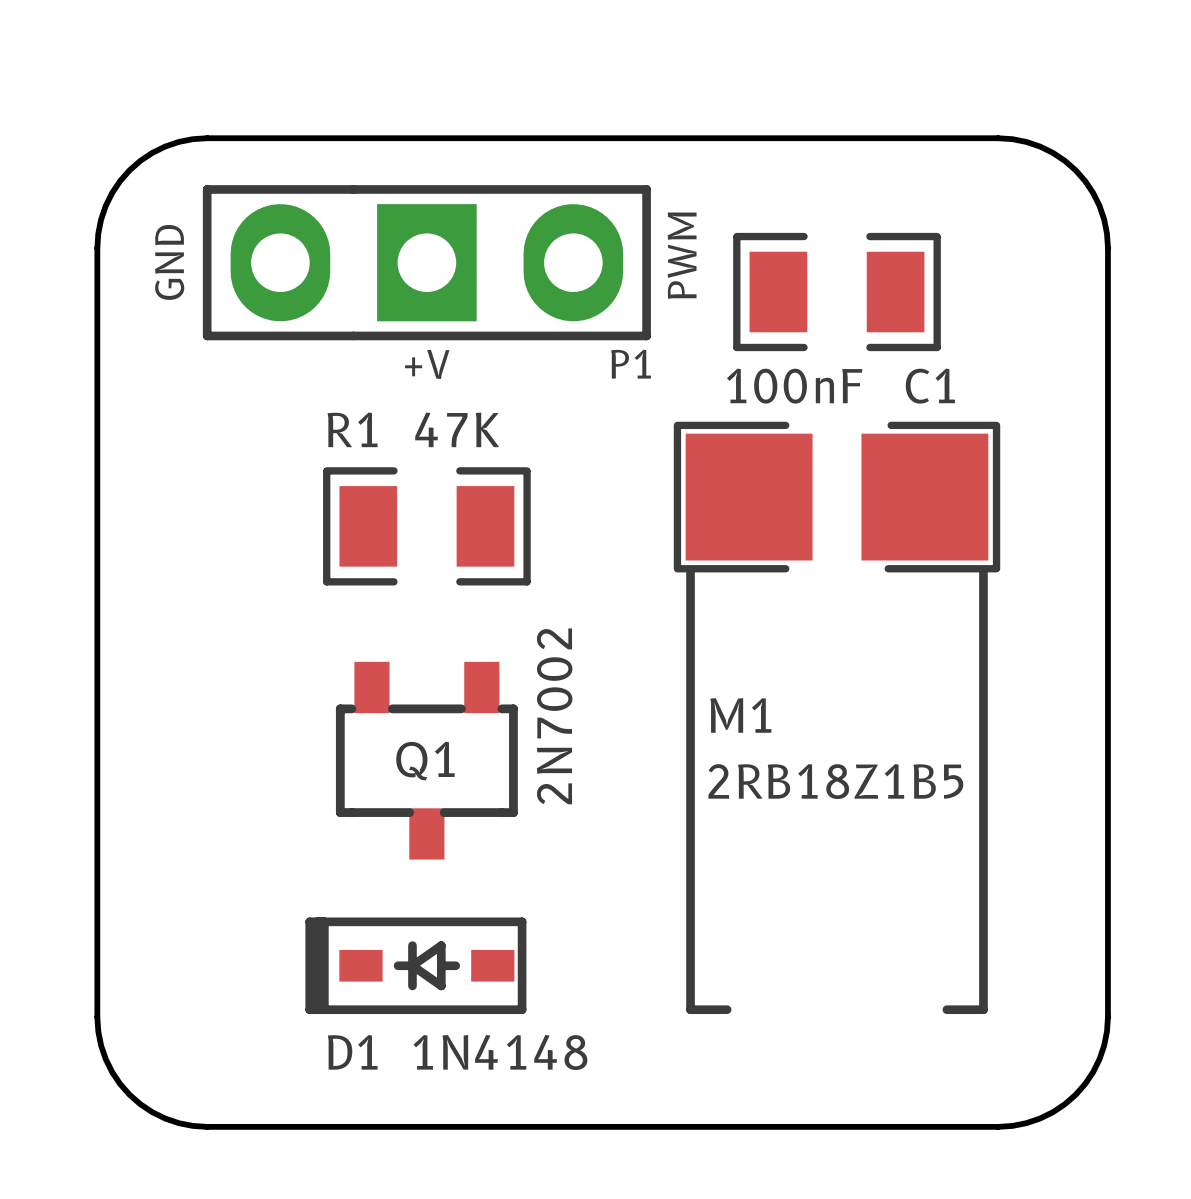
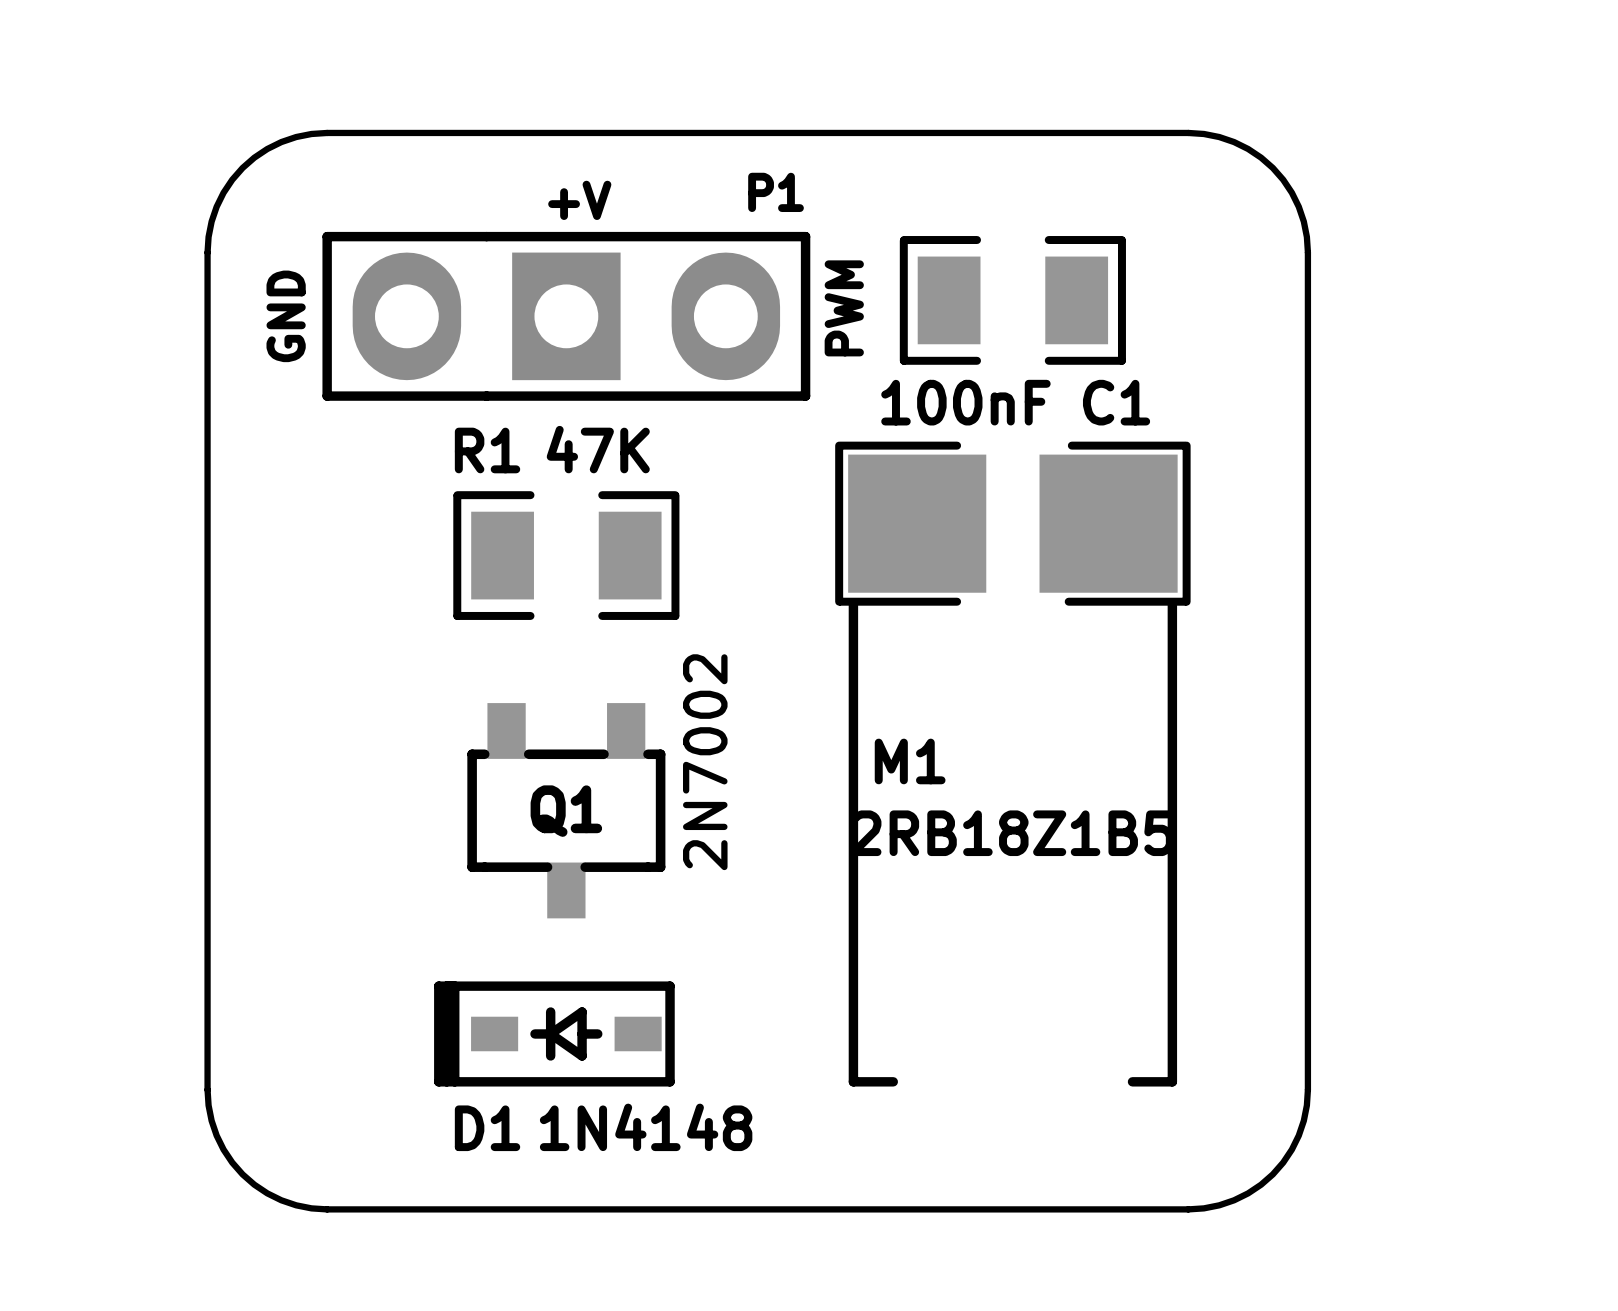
P1 position: (426, 262) -> (566, 316)
P1 text position: +V (427, 364) -> +V (579, 200)
P1 name position: P1 (631, 364) -> P1 (776, 192)

